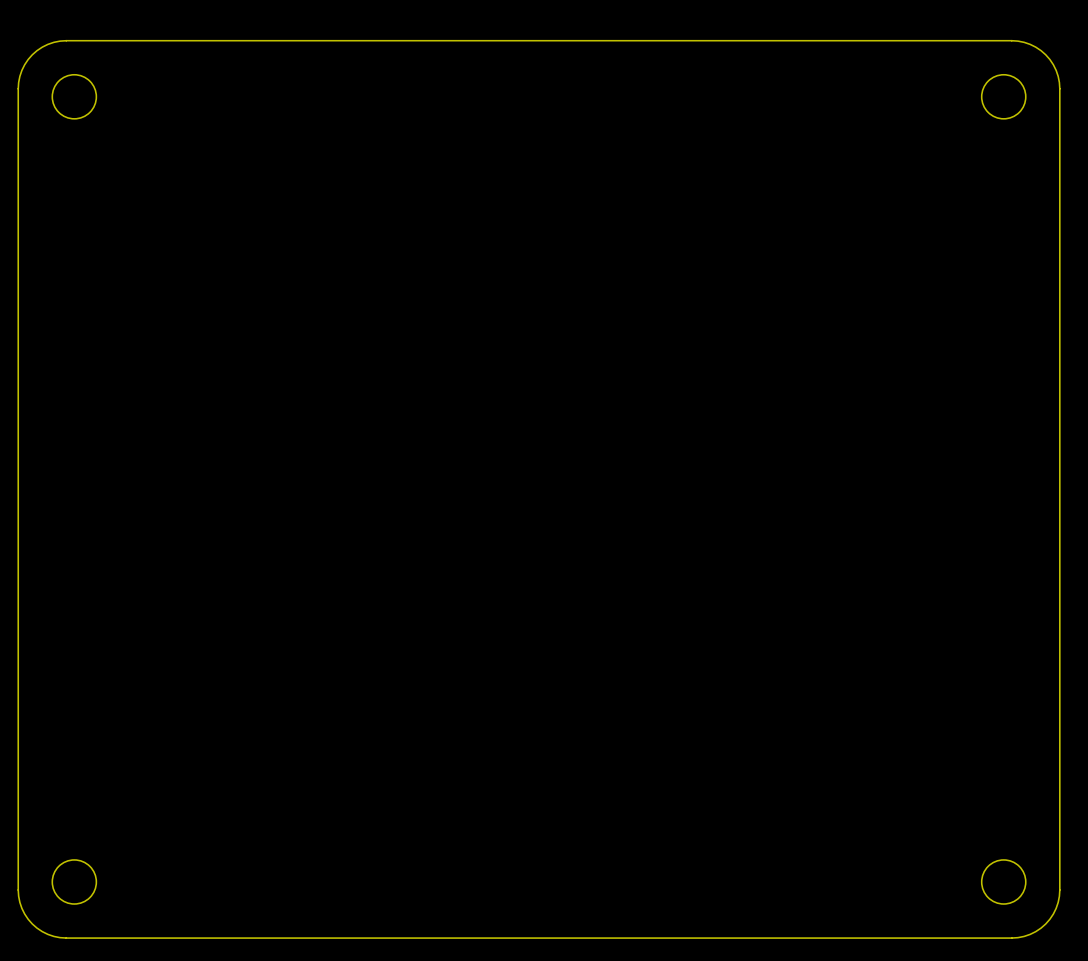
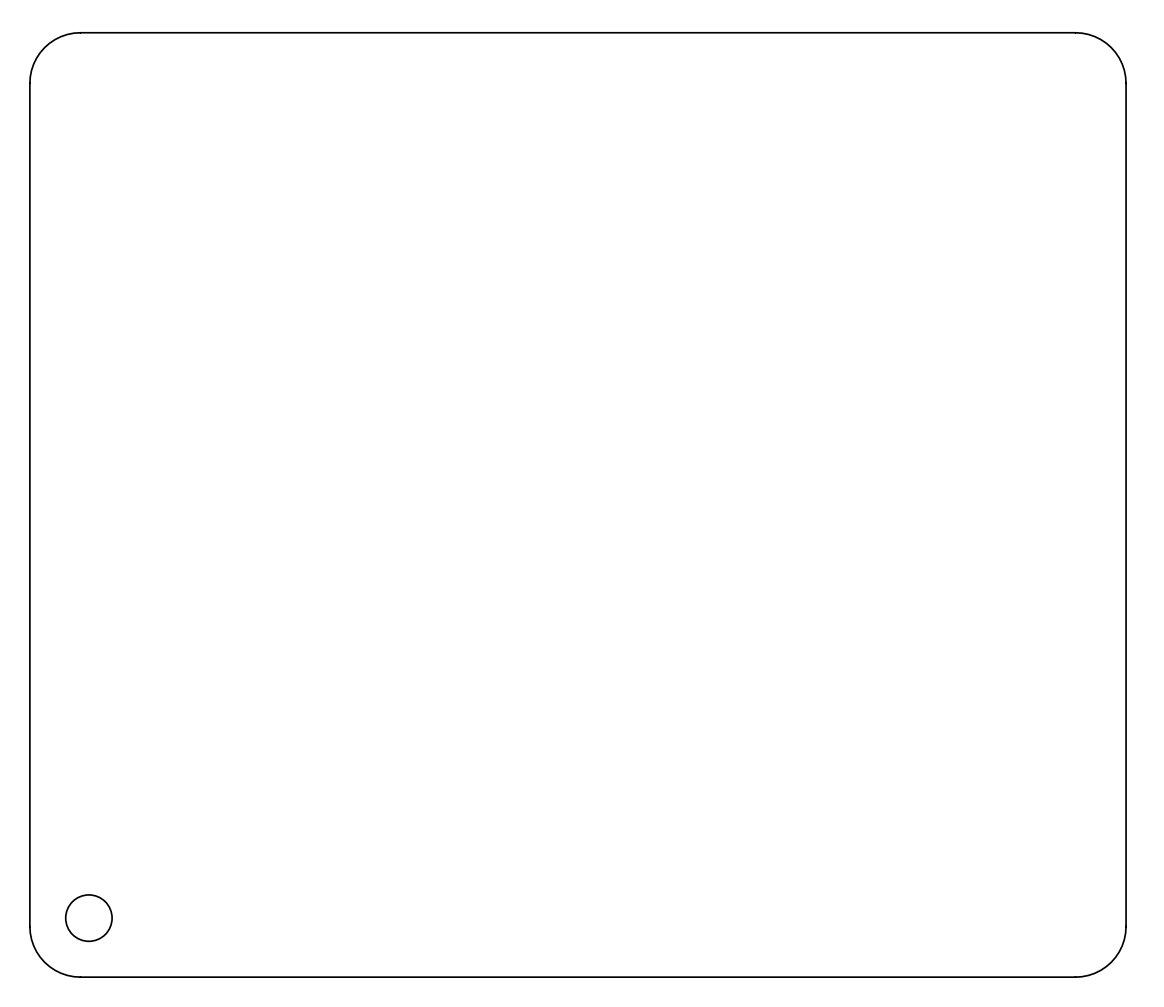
round board edge: [51, 73, 98, 120] -> none
round board edge: [980, 73, 1027, 120] -> none
round board edge: [980, 859, 1027, 905] -> none

